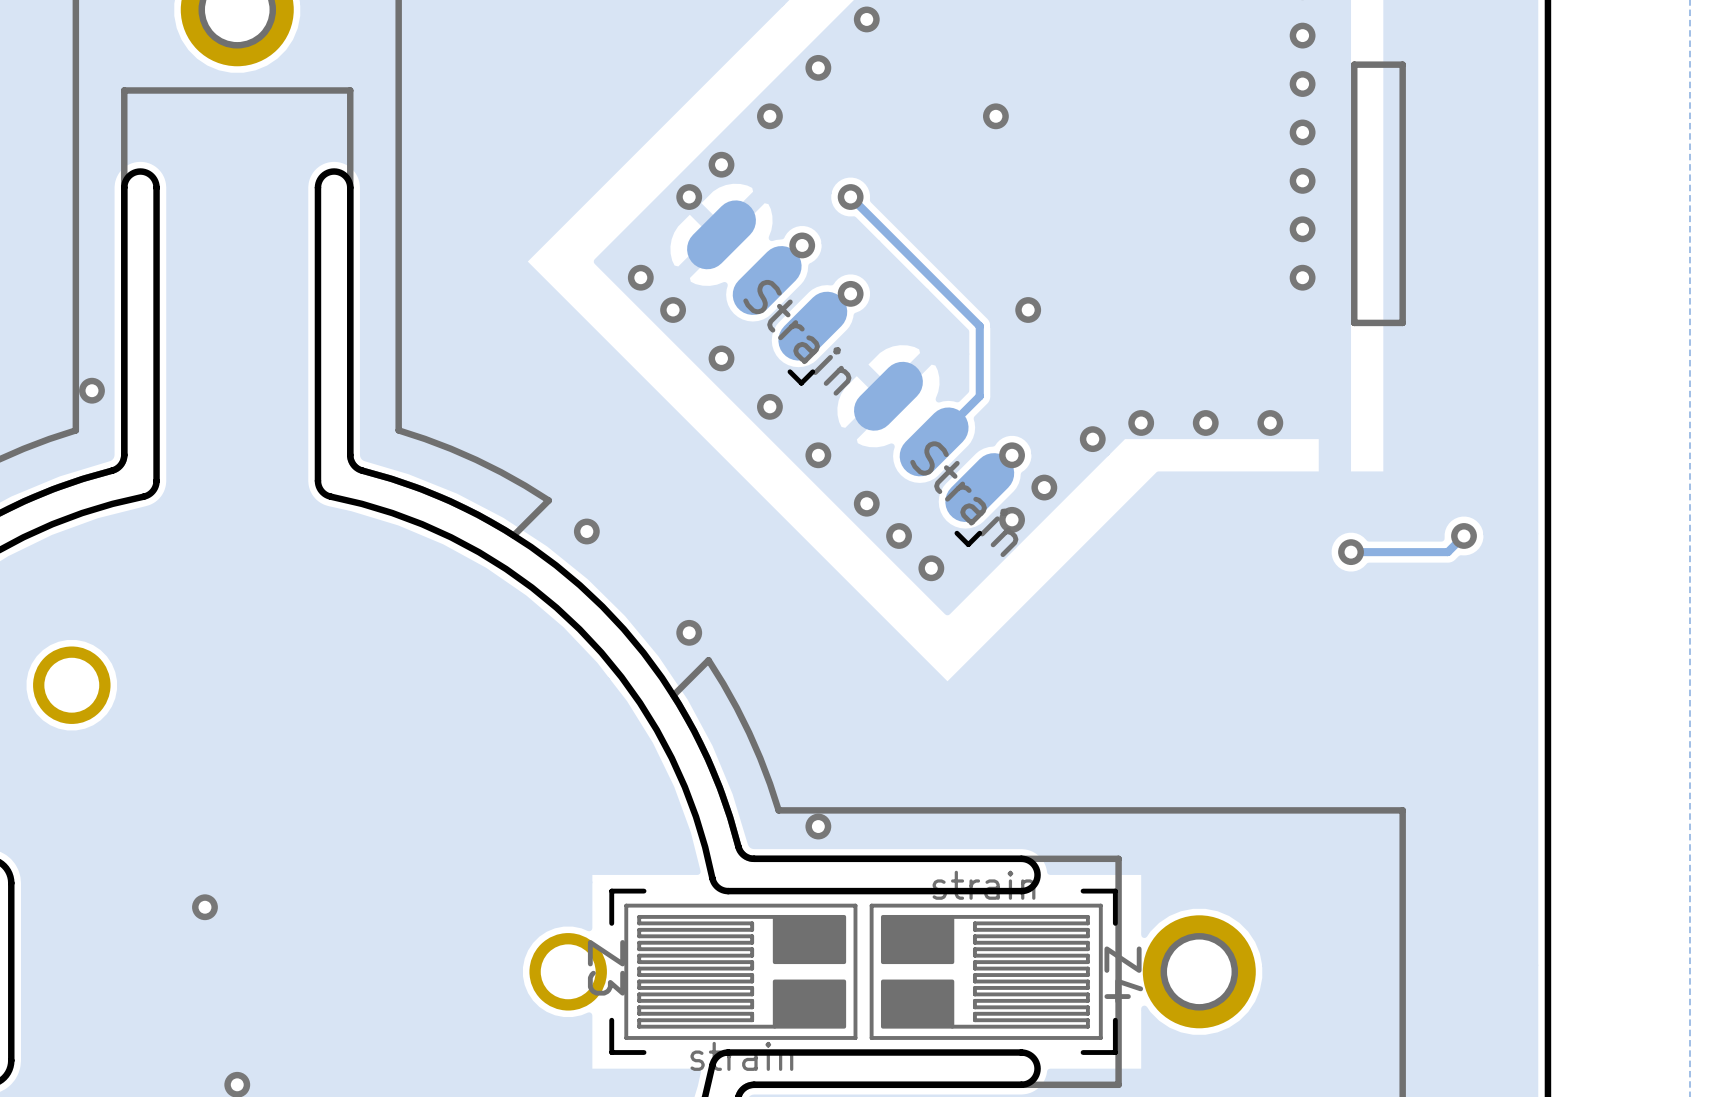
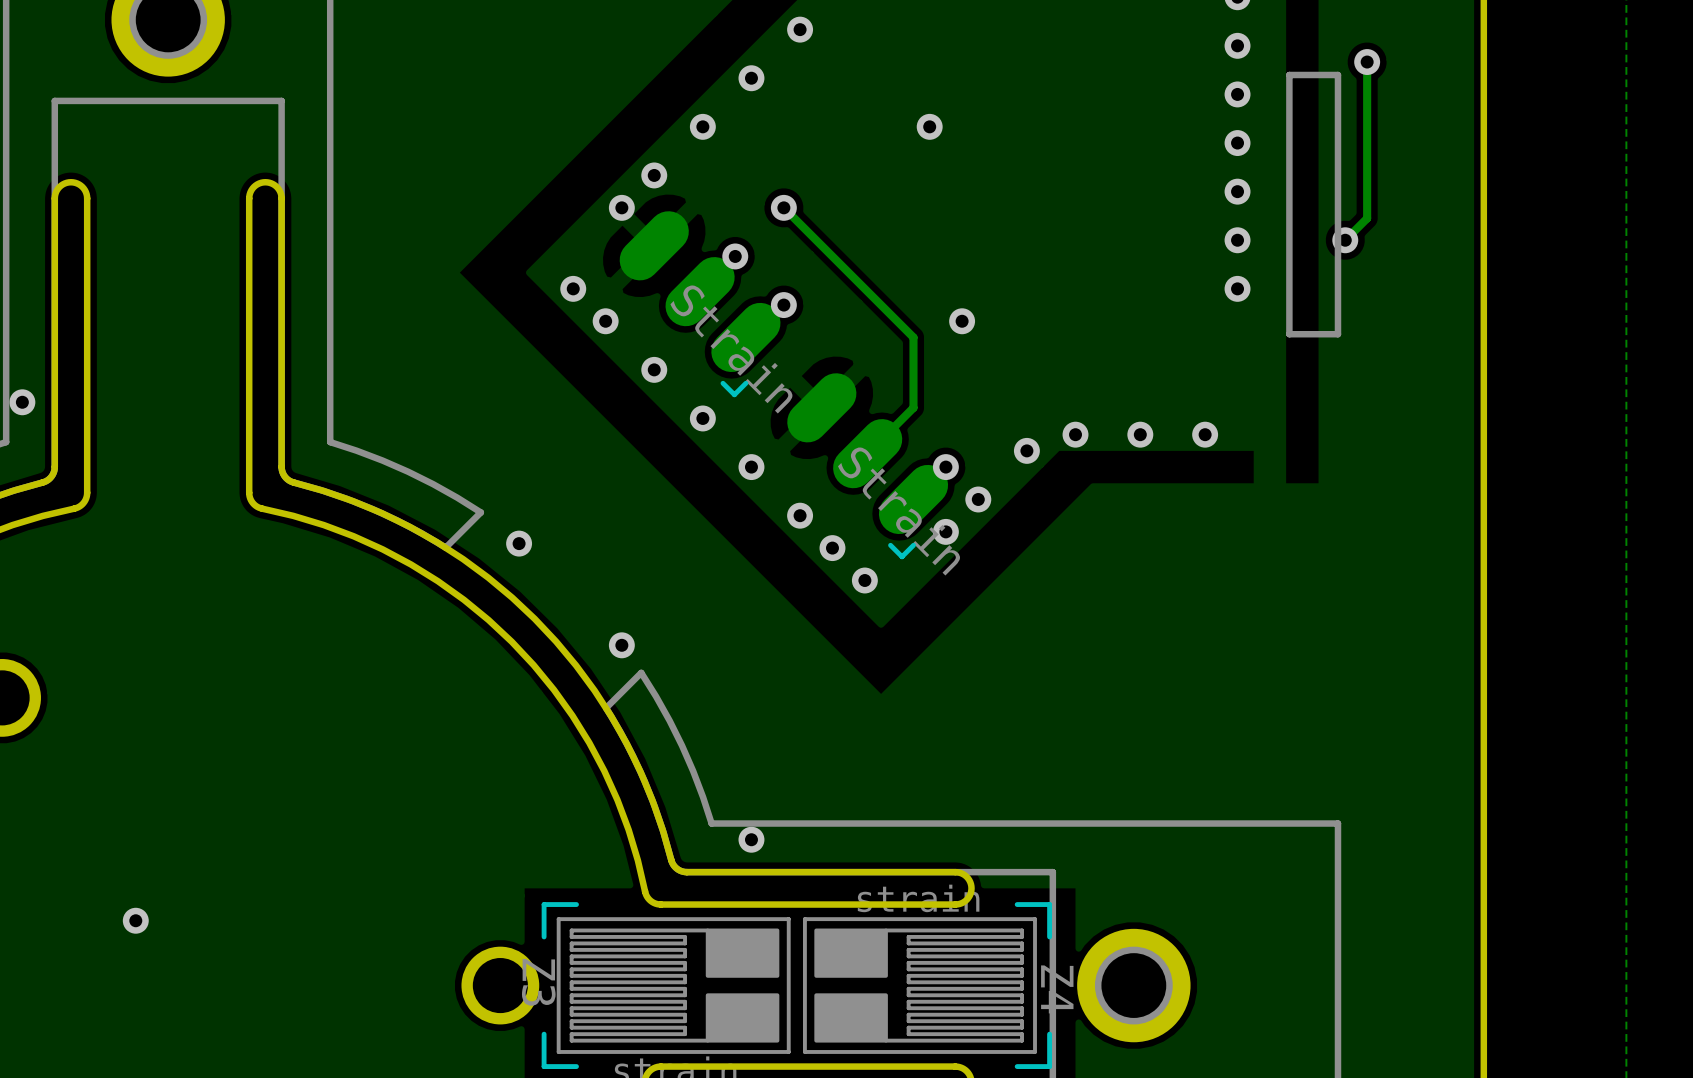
track: none -> (1367, 62) (1367, 218) (1345, 240)
via: none -> (1367, 62)
via: none -> (1345, 240)
track: (1464, 535) (1447, 552) (1351, 552) -> none
via: (1464, 535) -> none
via: (1351, 552) -> none

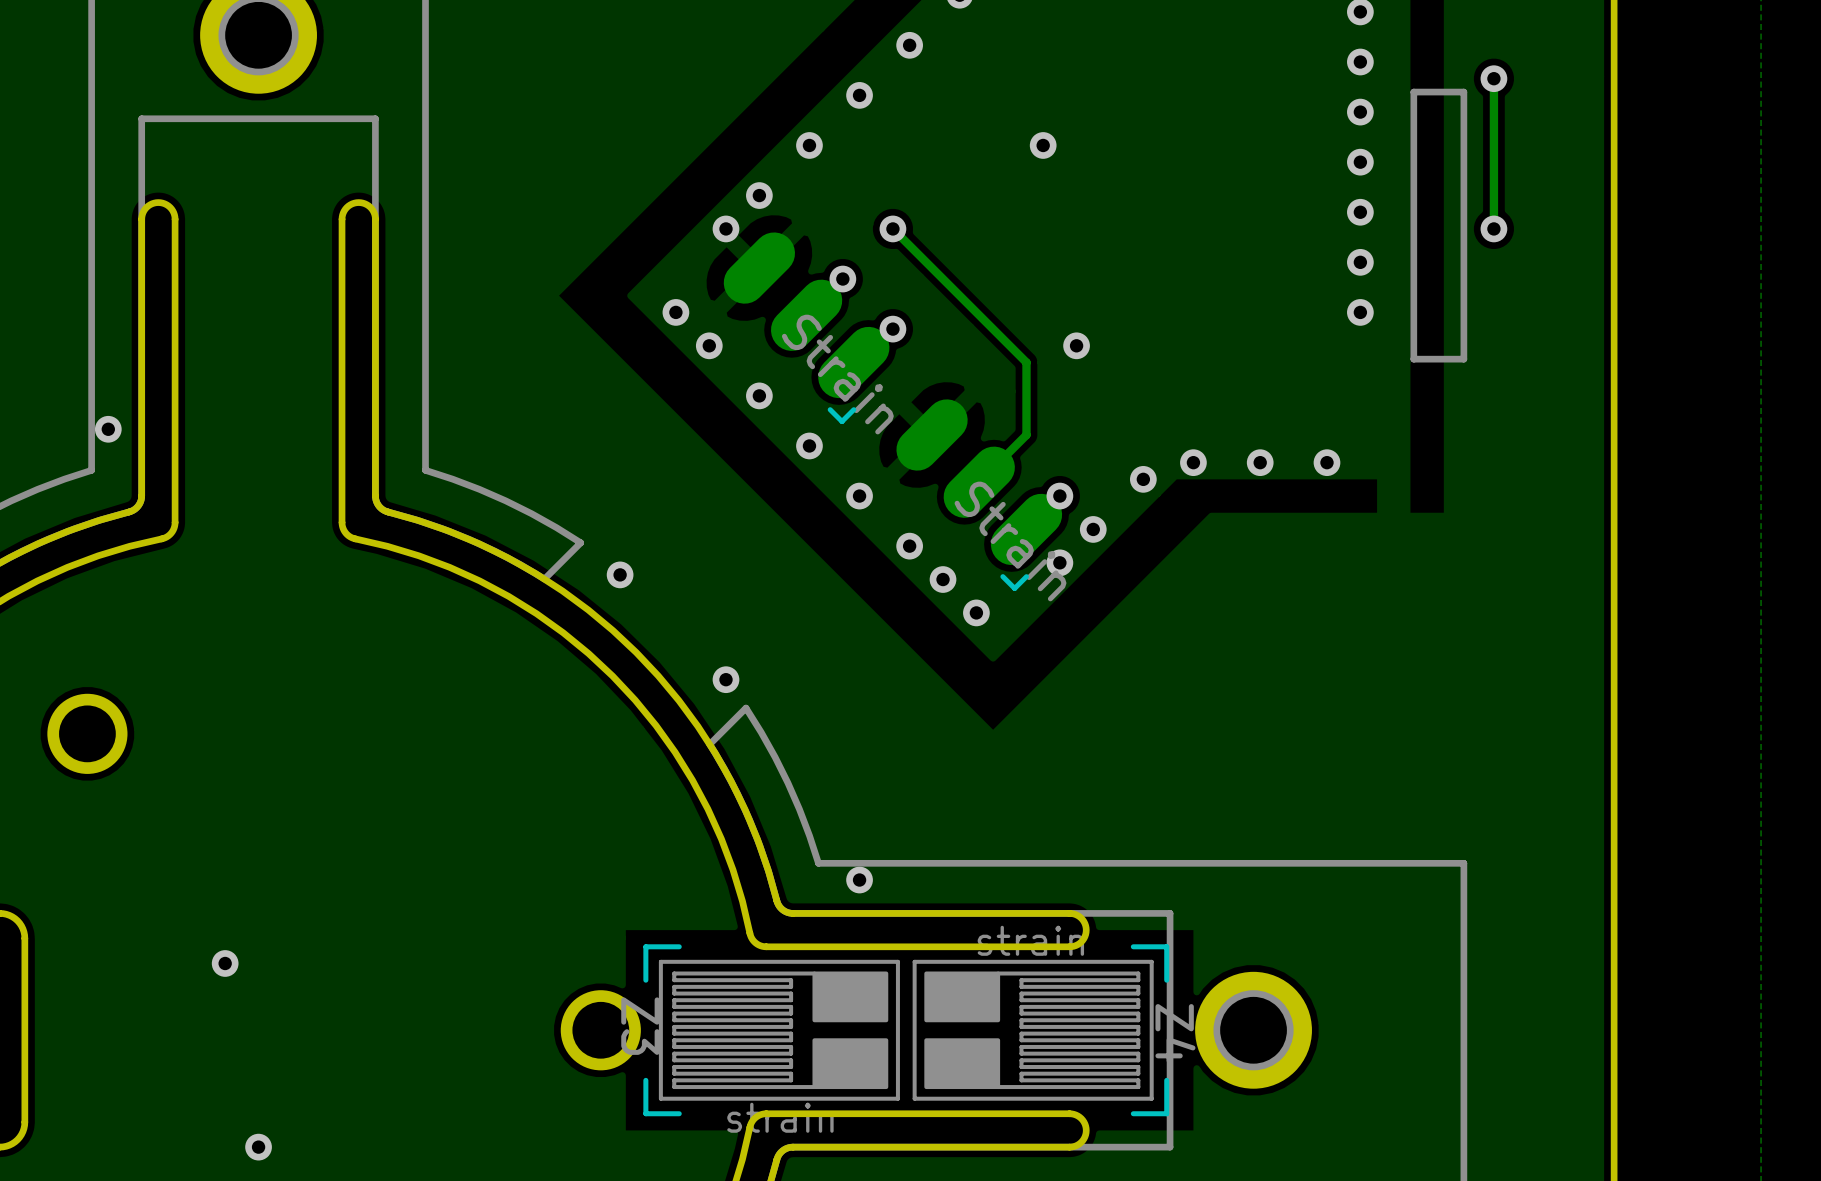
track: (1367, 207) (1367, 218) (1345, 240) -> none
via position: (1345, 240) -> (1493, 228)

